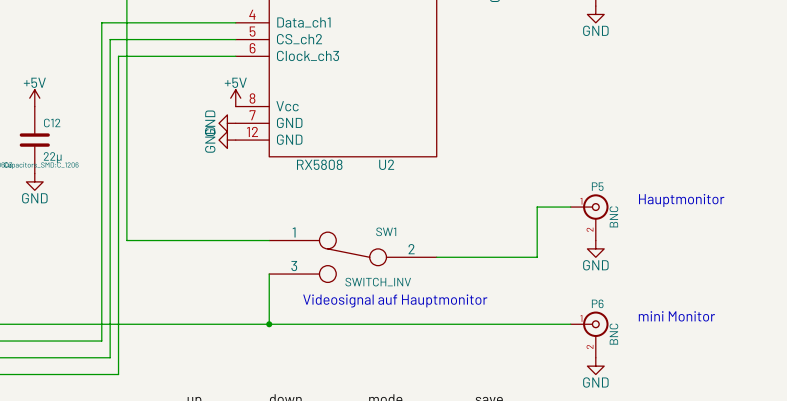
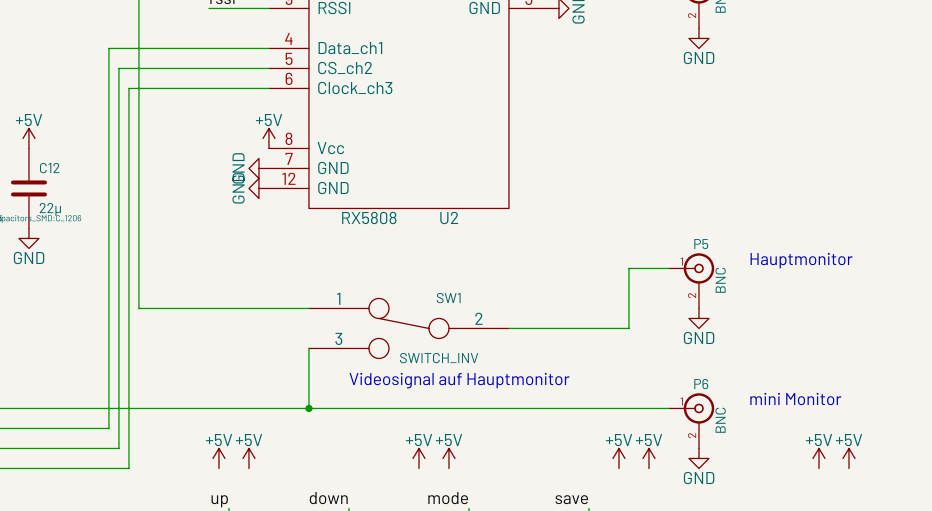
power symbol: none -> +5V (218, 458)
power symbol: none -> +5V (248, 458)
power symbol: none -> +5V (418, 458)
power symbol: none -> +5V (448, 458)
power symbol: none -> +5V (618, 458)
power symbol: none -> +5V (648, 458)
power symbol: none -> +5V (818, 458)
power symbol: none -> +5V (848, 458)

